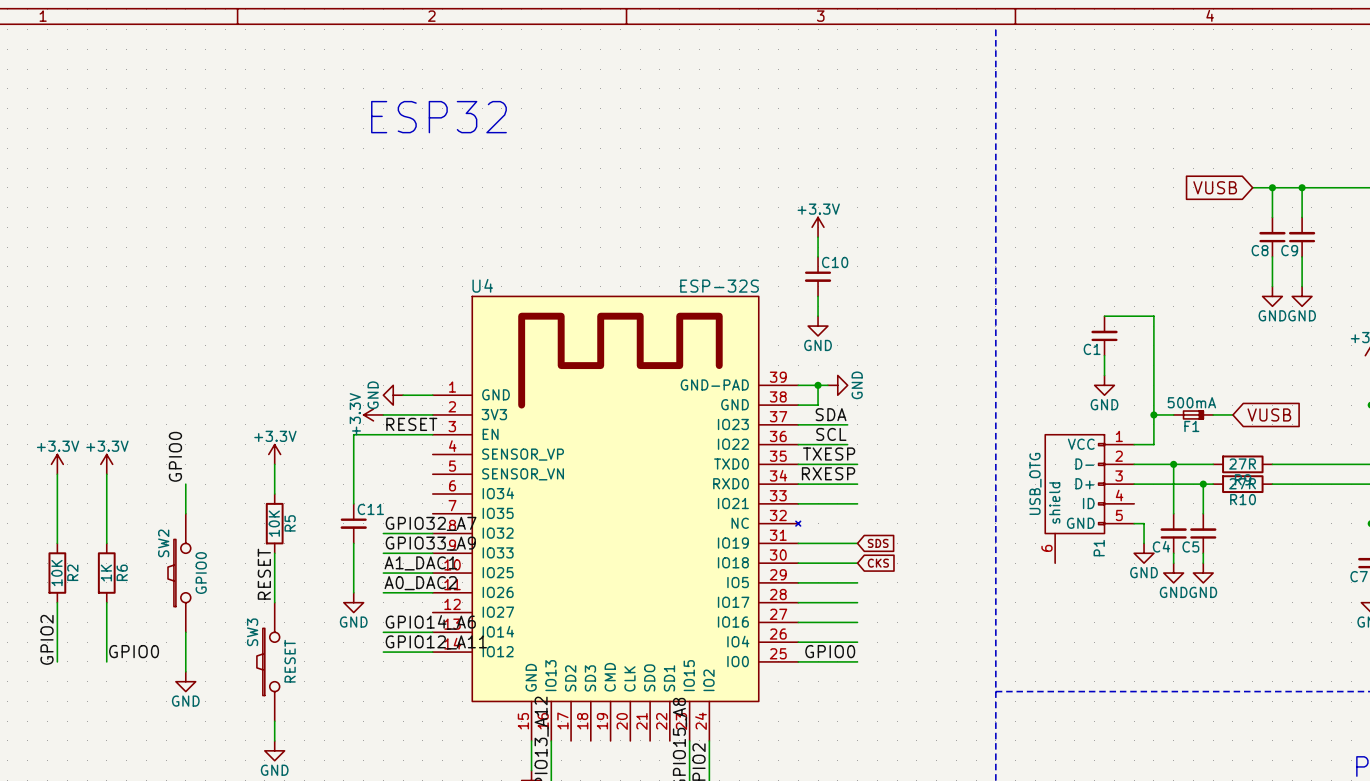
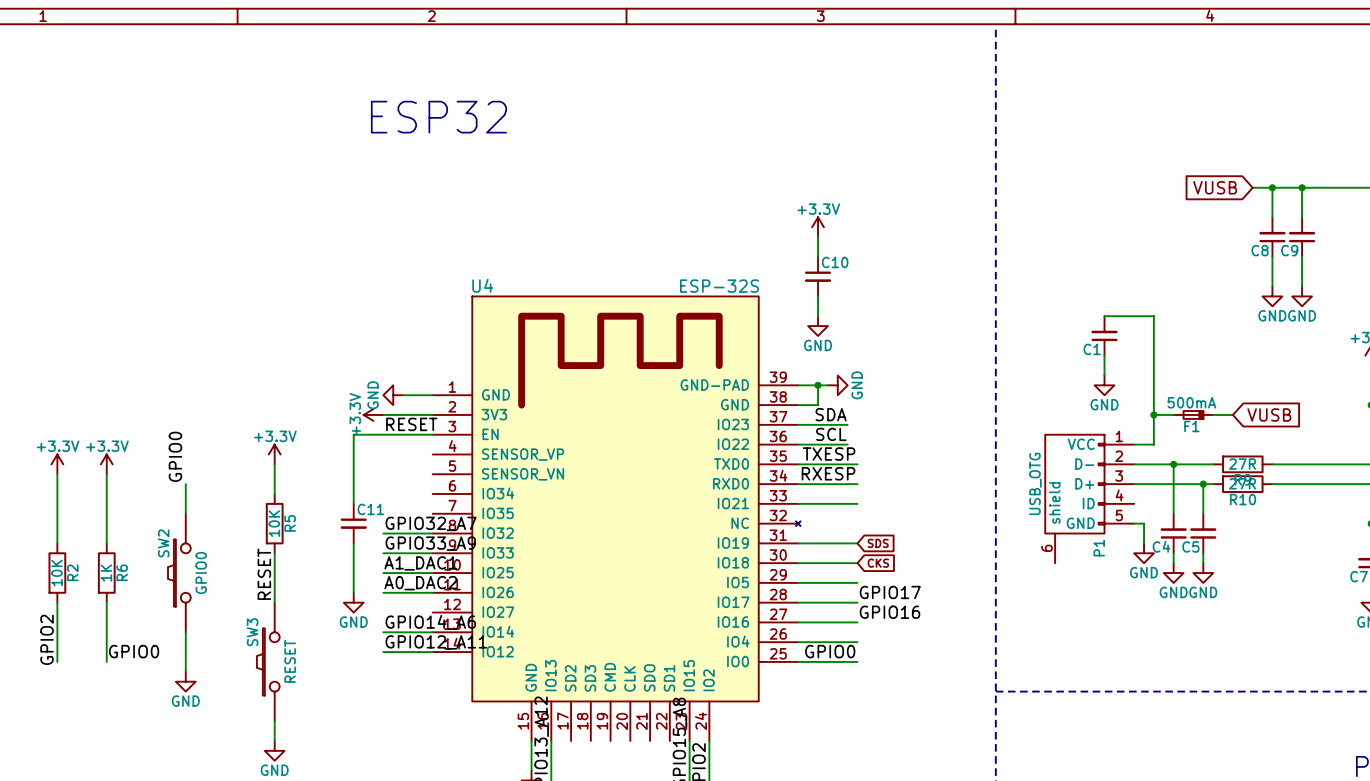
label: none -> GPIO17 (890, 592)
label: none -> GPIO16 (889, 612)

